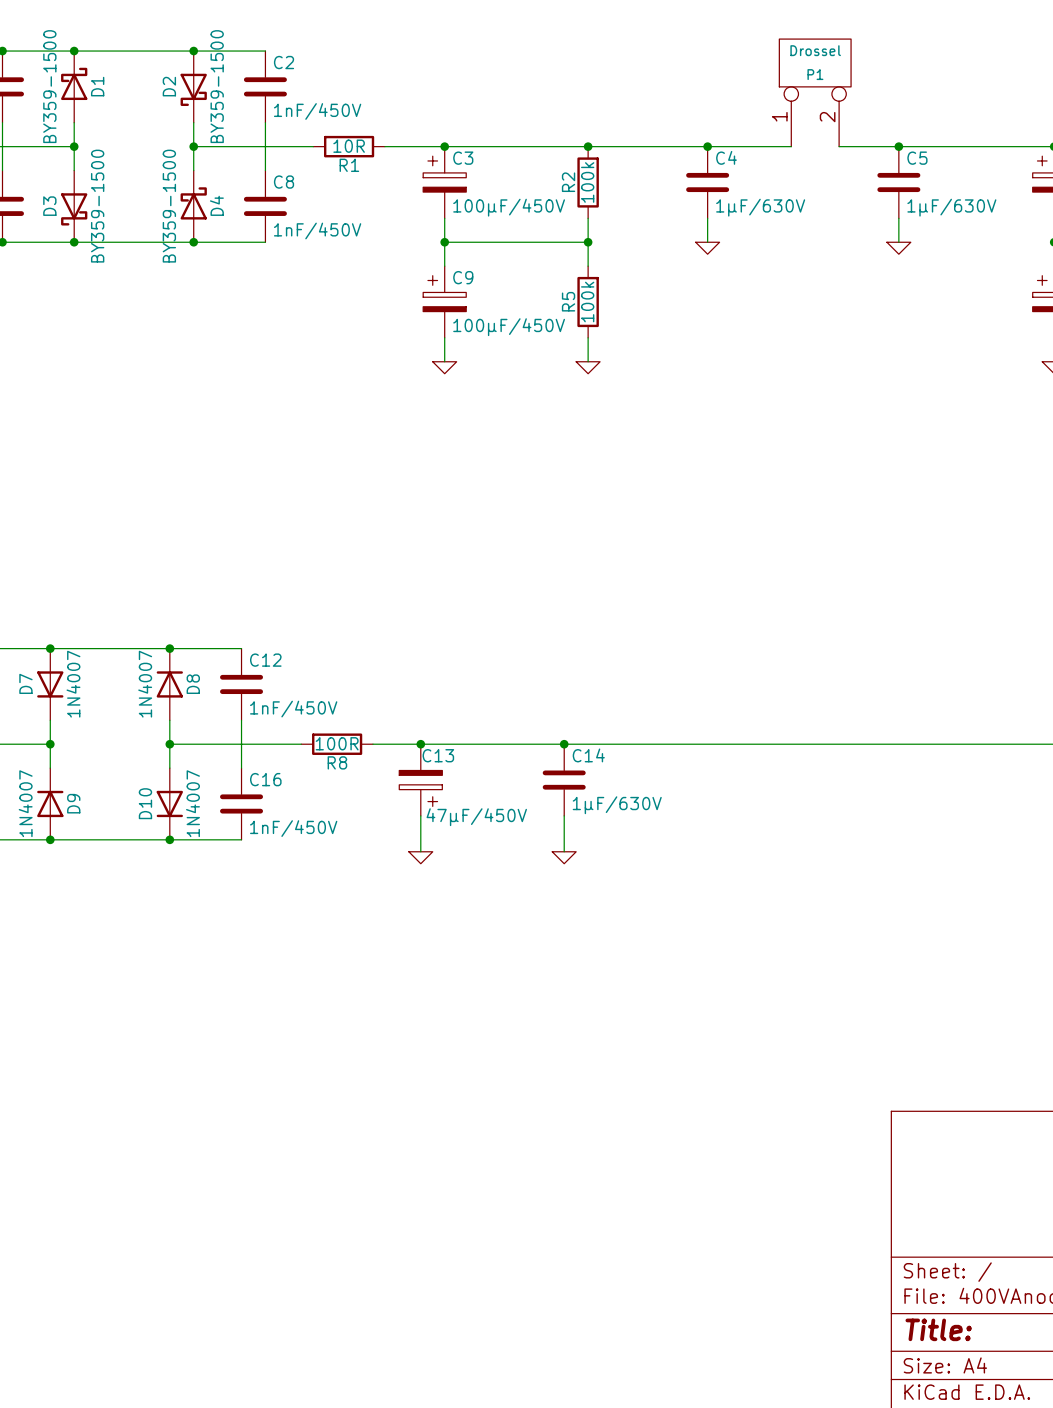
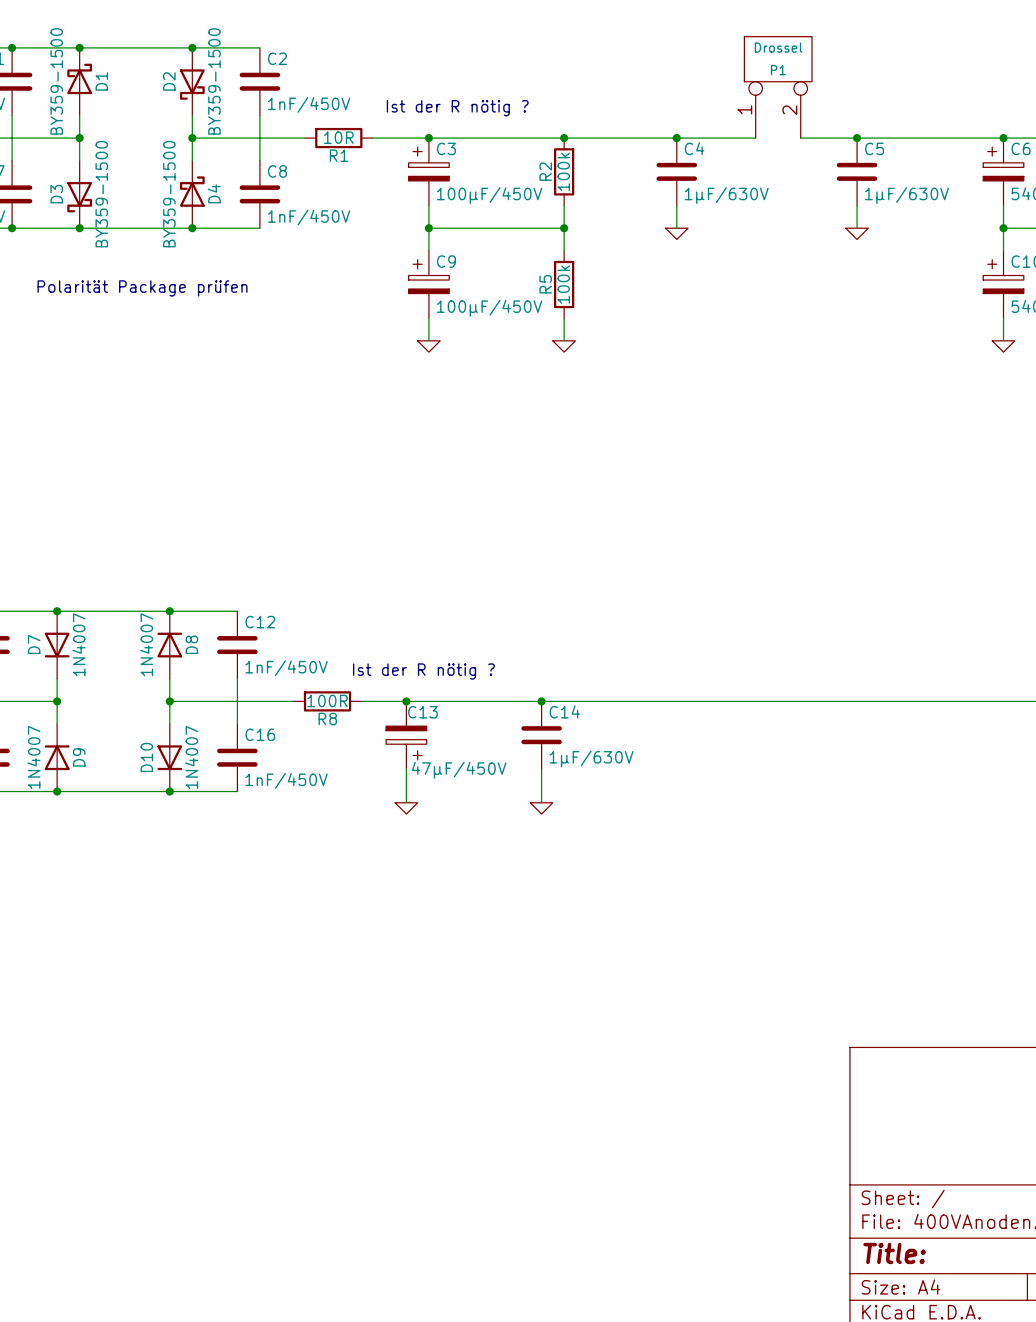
text: none -> Ist der R nötig ? (457, 108)
text: none -> Polarität Package prüfen (142, 288)
text: none -> Ist der R nötig ? (423, 671)

